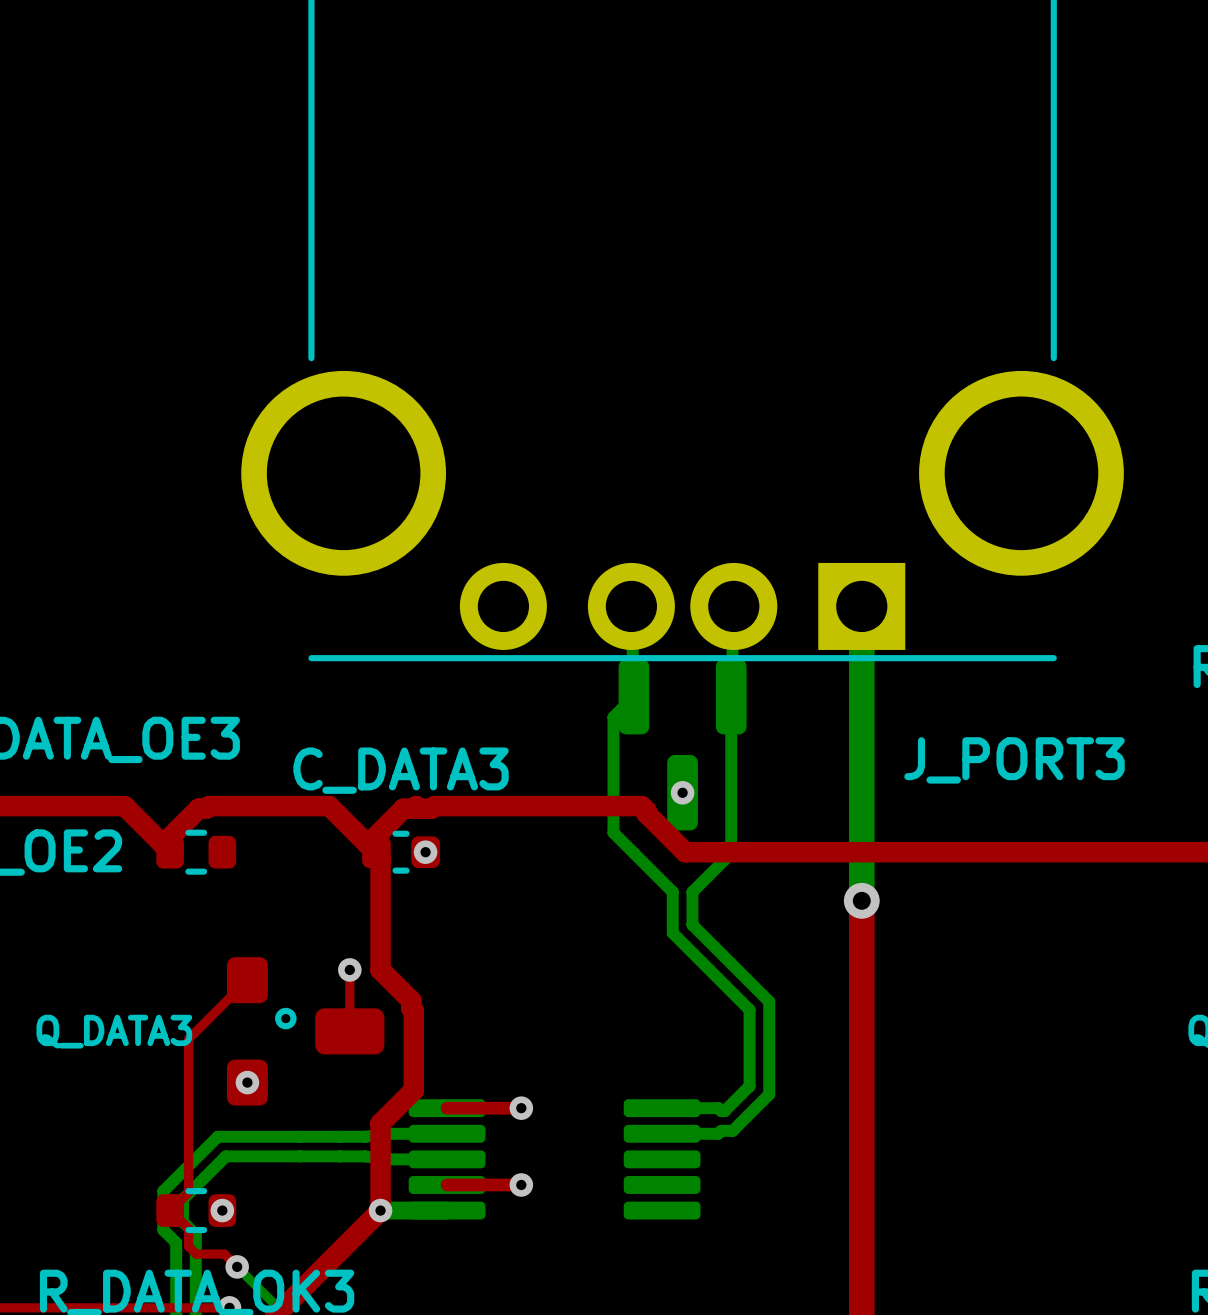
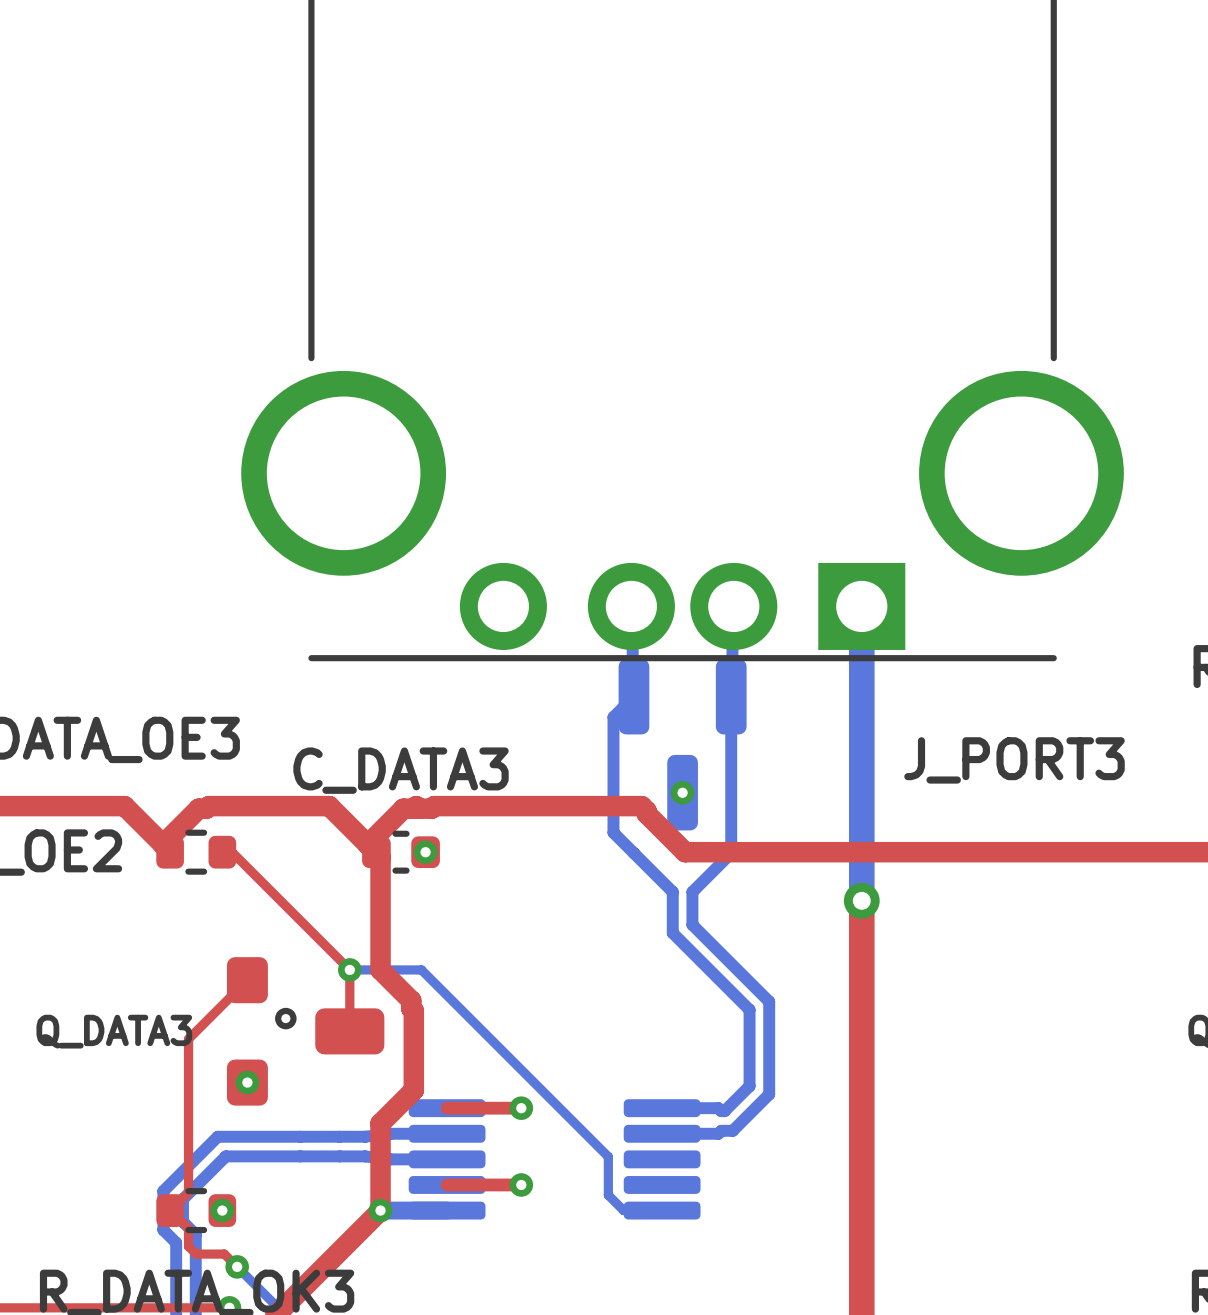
top track: none -> (221, 852) (232, 852) (349, 969)
bottom track: none -> (349, 969) (421, 969) (608, 1156) (608, 1195) (623, 1210) (662, 1210)

